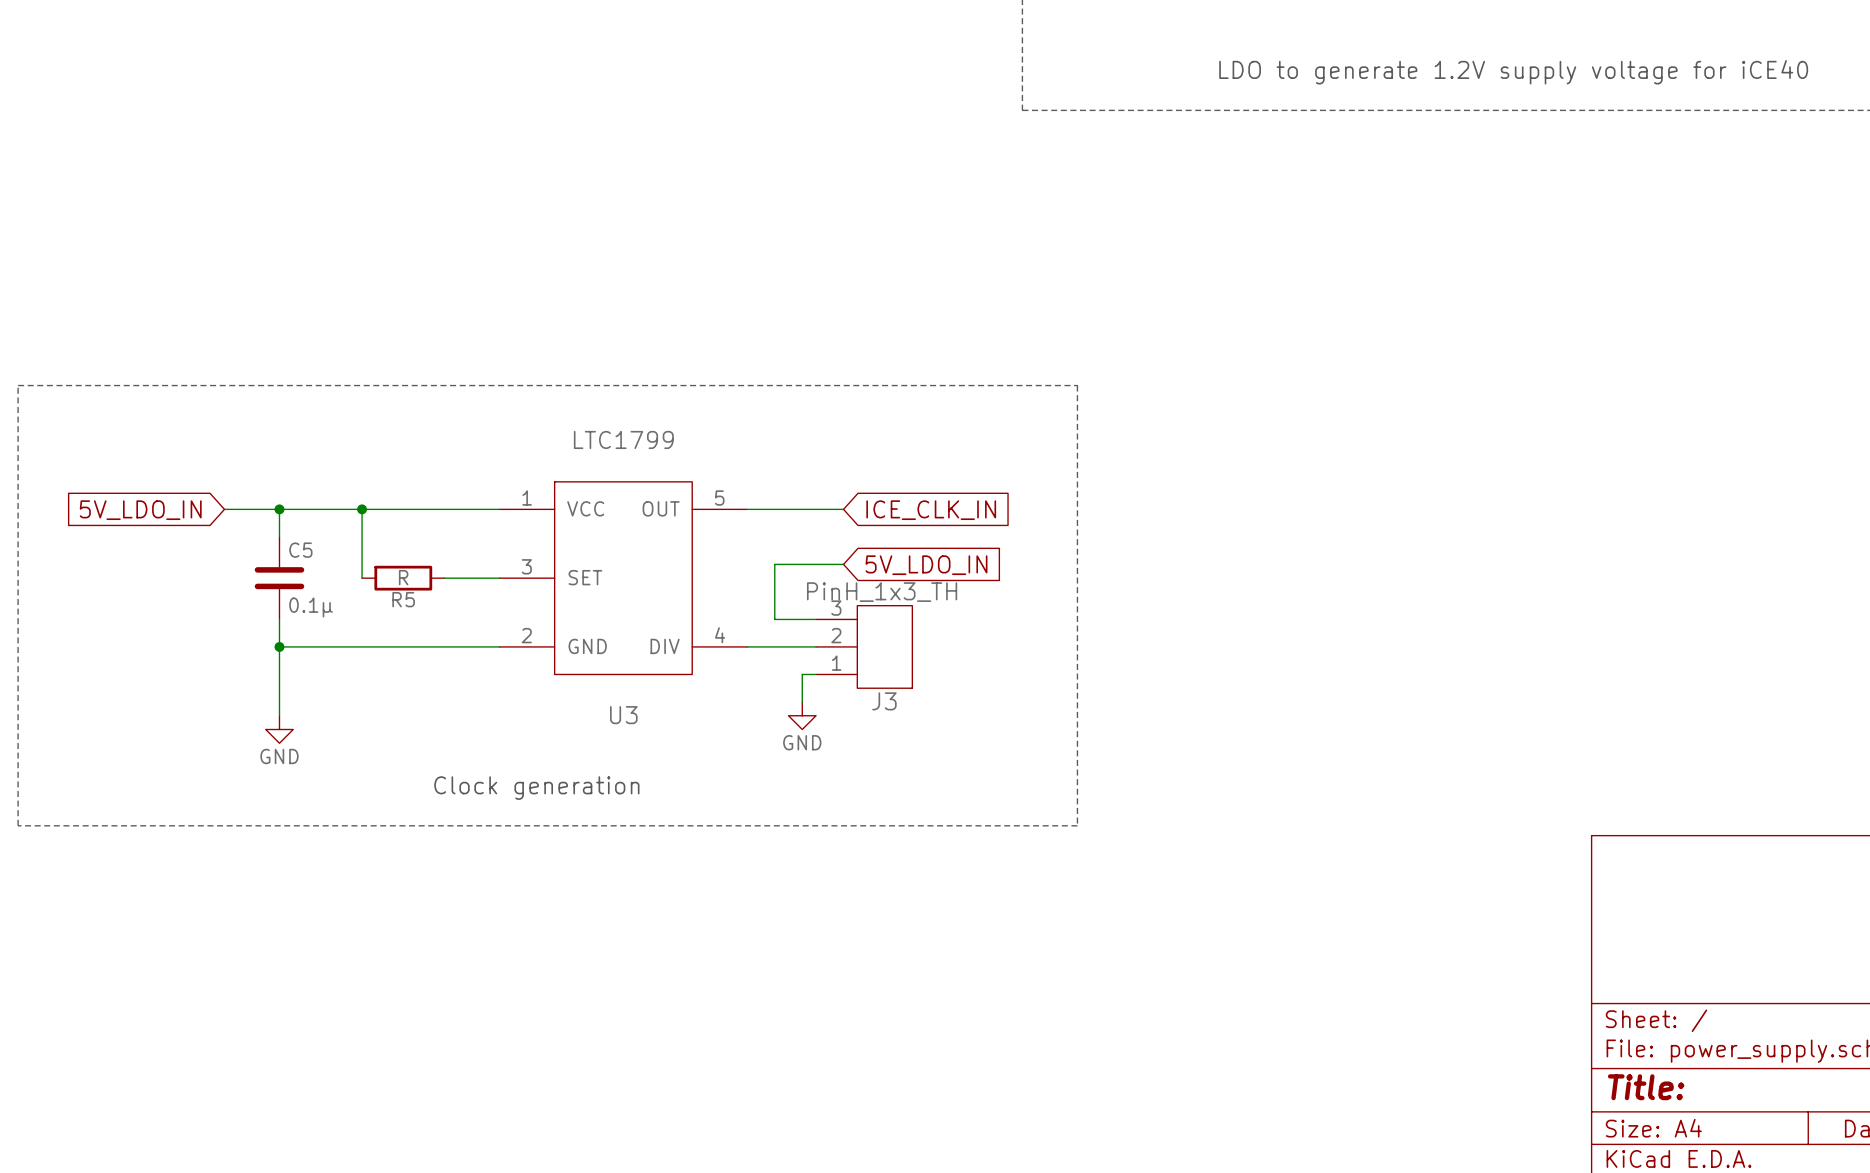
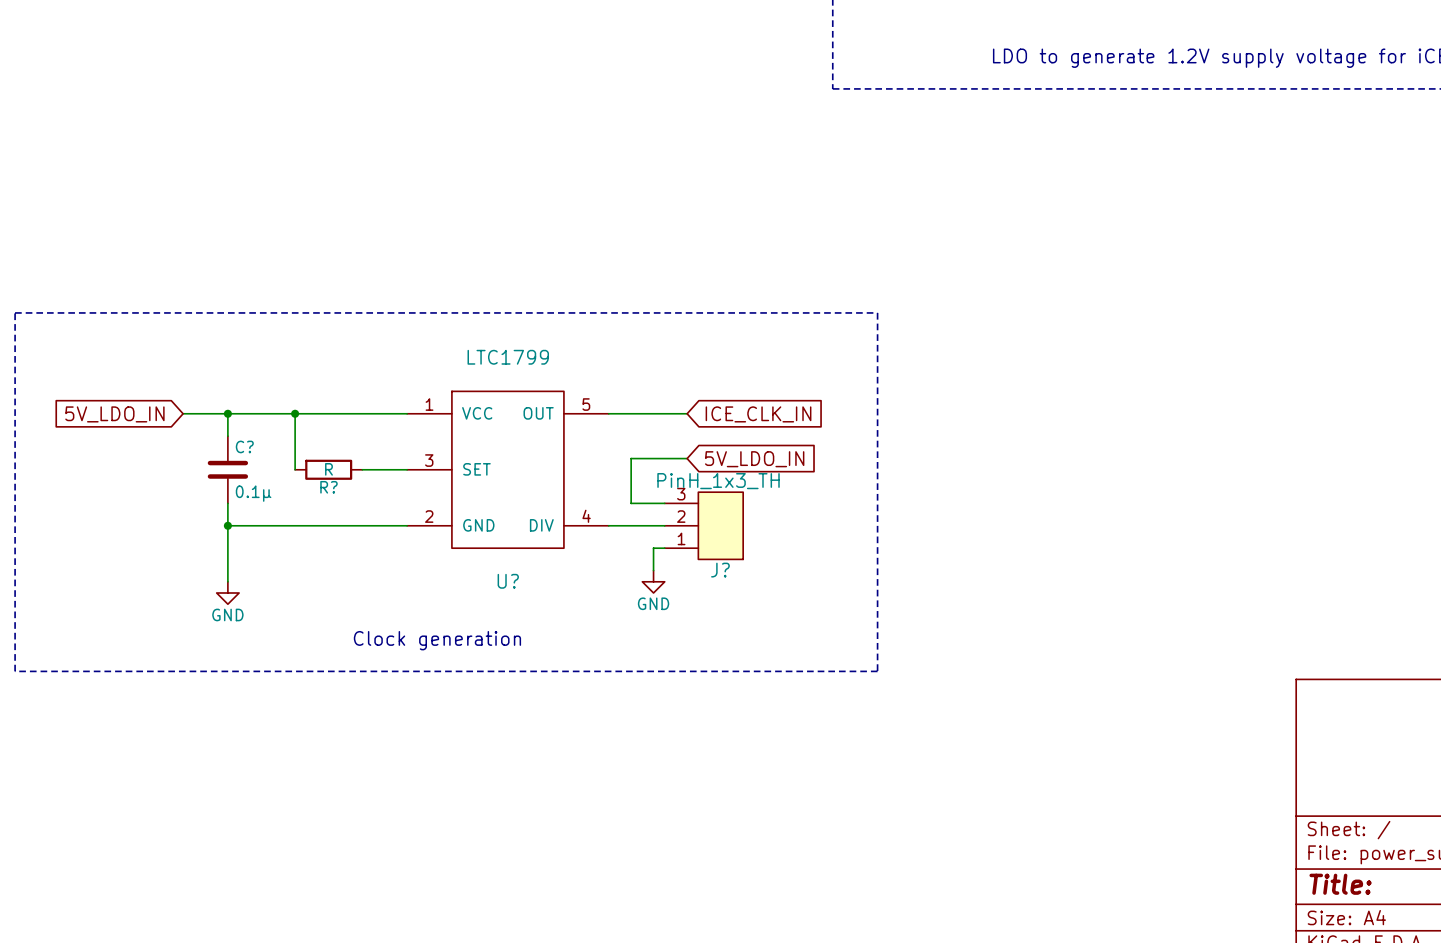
C5 name: C5 (300, 550) -> C? (244, 446)
R5 name: R5 (403, 599) -> R? (328, 487)
J3 name: J3 (884, 701) -> J? (720, 570)
U3 name: U3 (623, 715) -> U? (508, 581)

